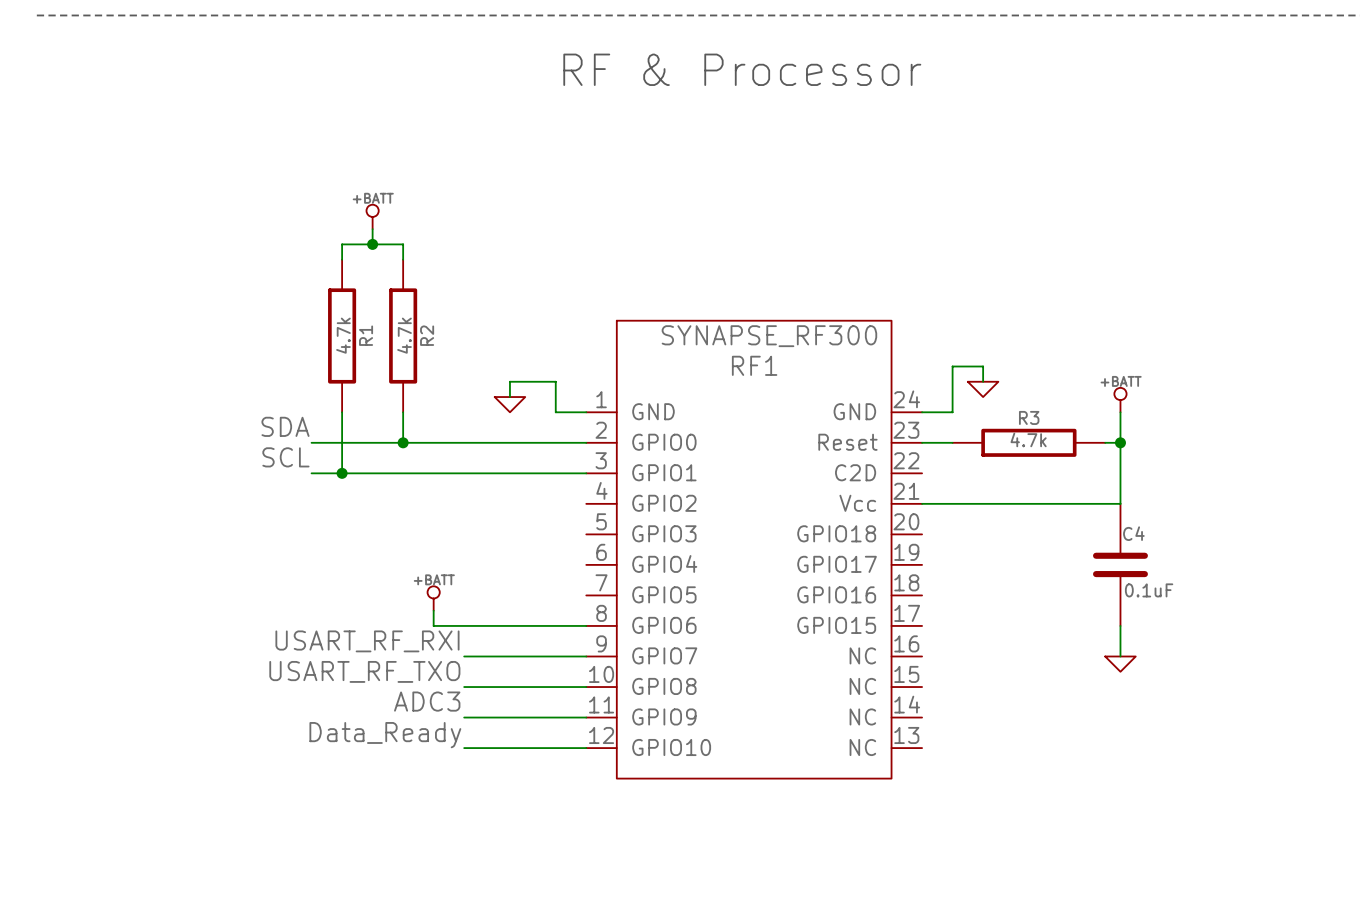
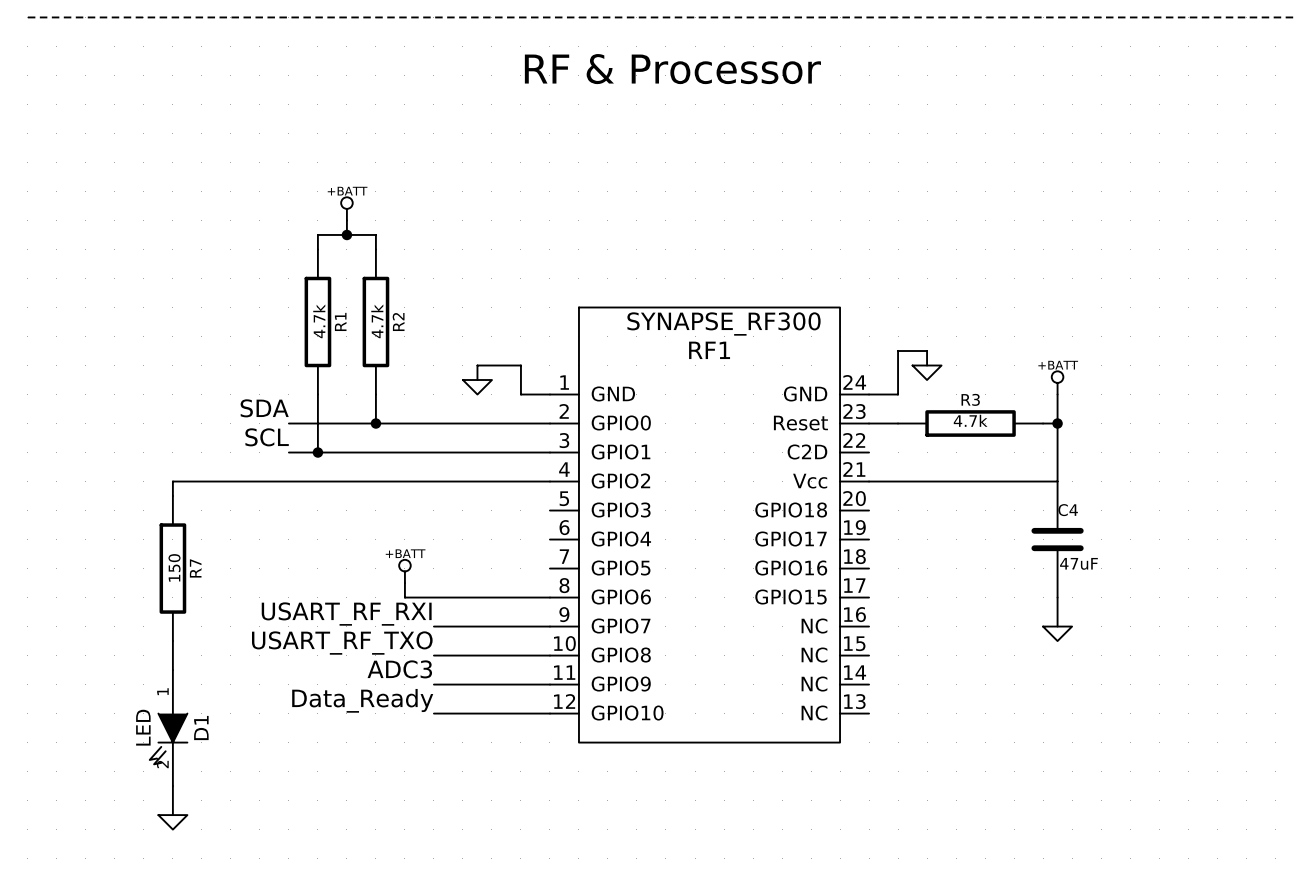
wire: none -> (549, 481) (172, 481) (172, 496)
C4 value: 0.1uF (1149, 590) -> 47uF (1078, 563)
R7: none -> 150 (172, 568)
wire: none -> (172, 641) (172, 670)
D1: none -> LED (168, 728)
wire: none -> (172, 786) (172, 815)
power symbol: none -> (172, 822)

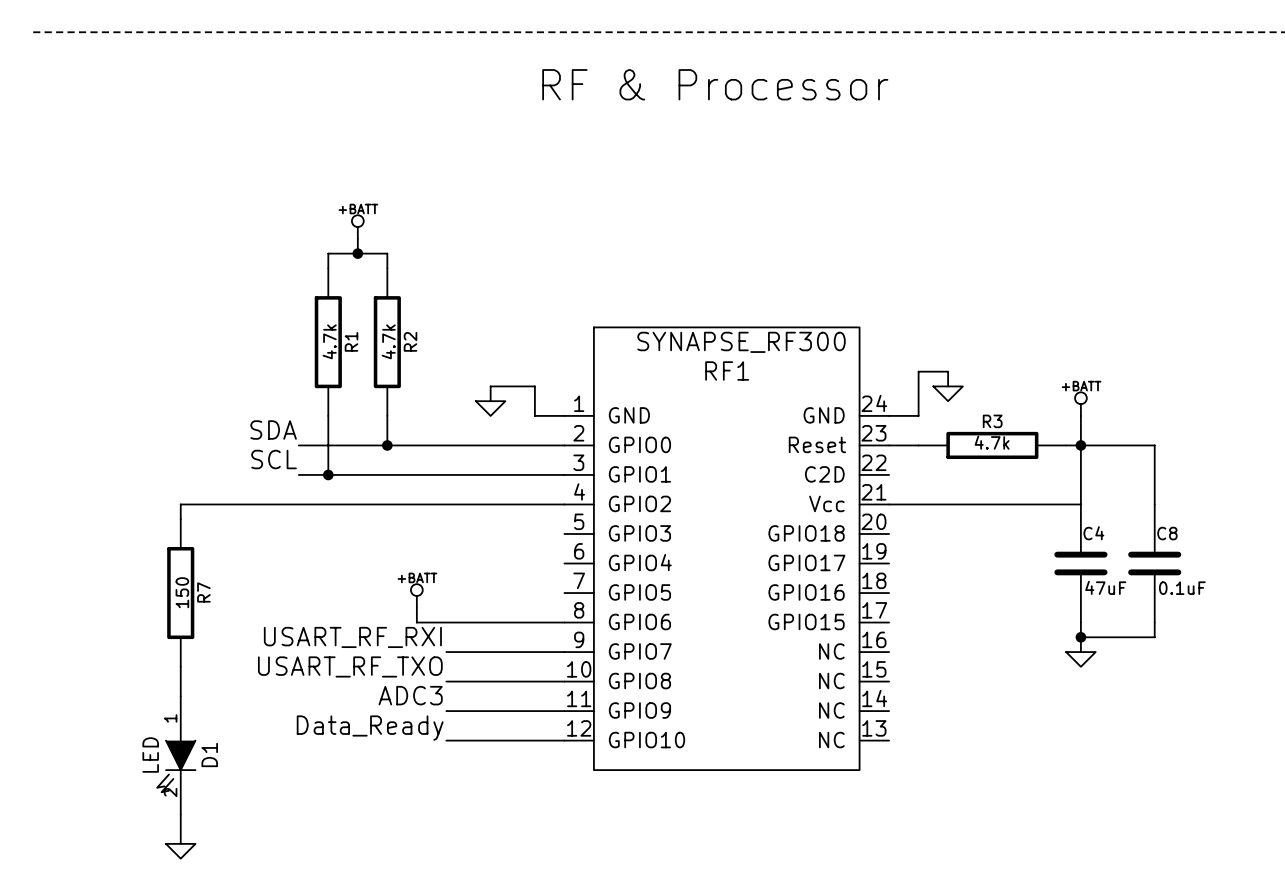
wire: none -> (1080, 445) (1154, 445) (1154, 504)
C8: none -> 0.1uF (1154, 563)
wire: none -> (1154, 622) (1154, 637) (1080, 637)
junction: none -> (1080, 637)

